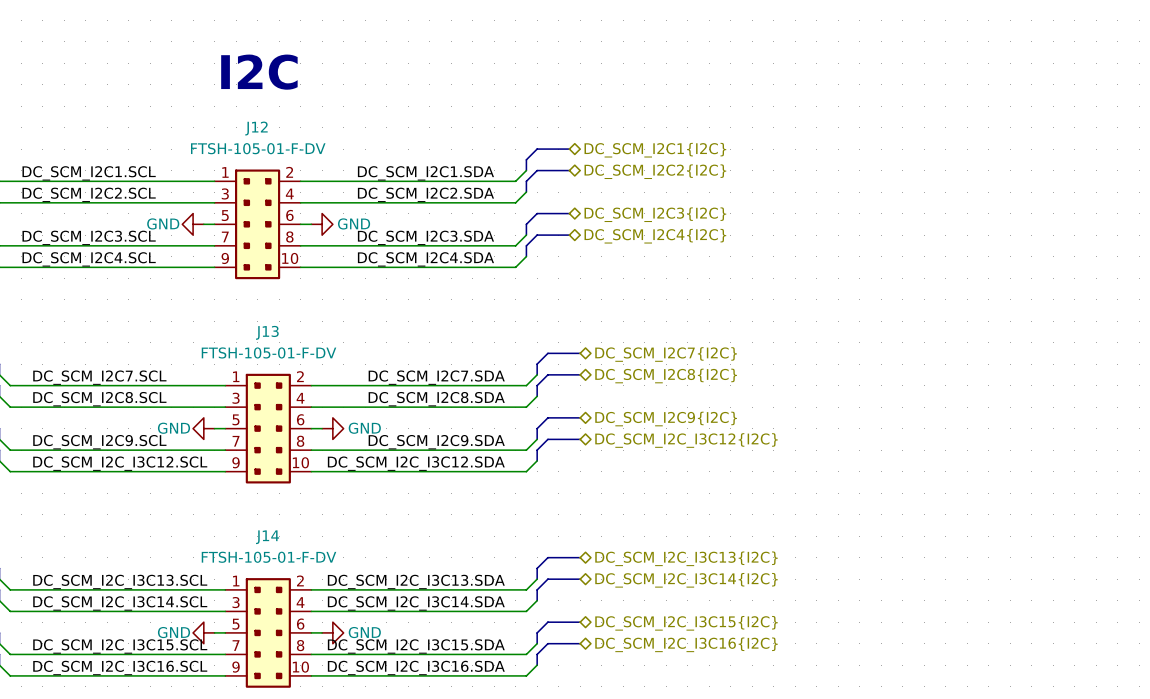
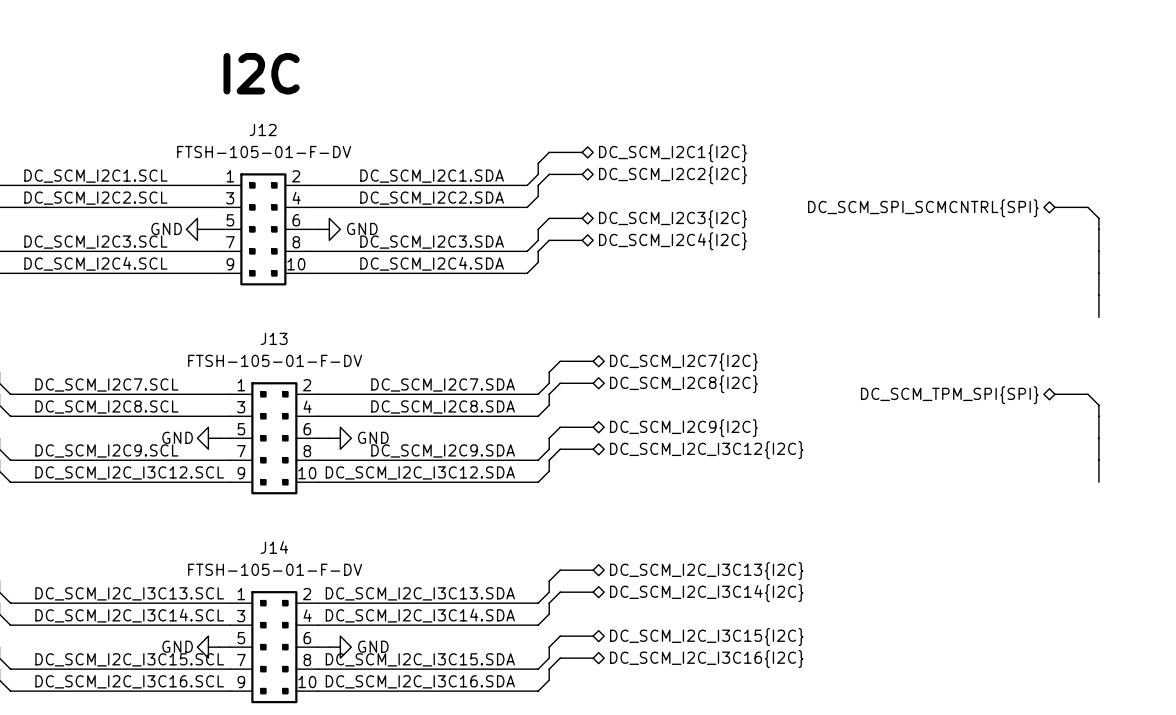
bus: none -> (1054, 207) (1087, 207) (1098, 218) (1098, 317)
hierarchical label: none -> DC_SCM_SPI_SCMCNTRL{SPI} (923, 208)
bus: none -> (1054, 394) (1087, 394) (1098, 405) (1098, 482)
hierarchical label: none -> DC_SCM_TPM_SPI{SPI} (949, 395)

